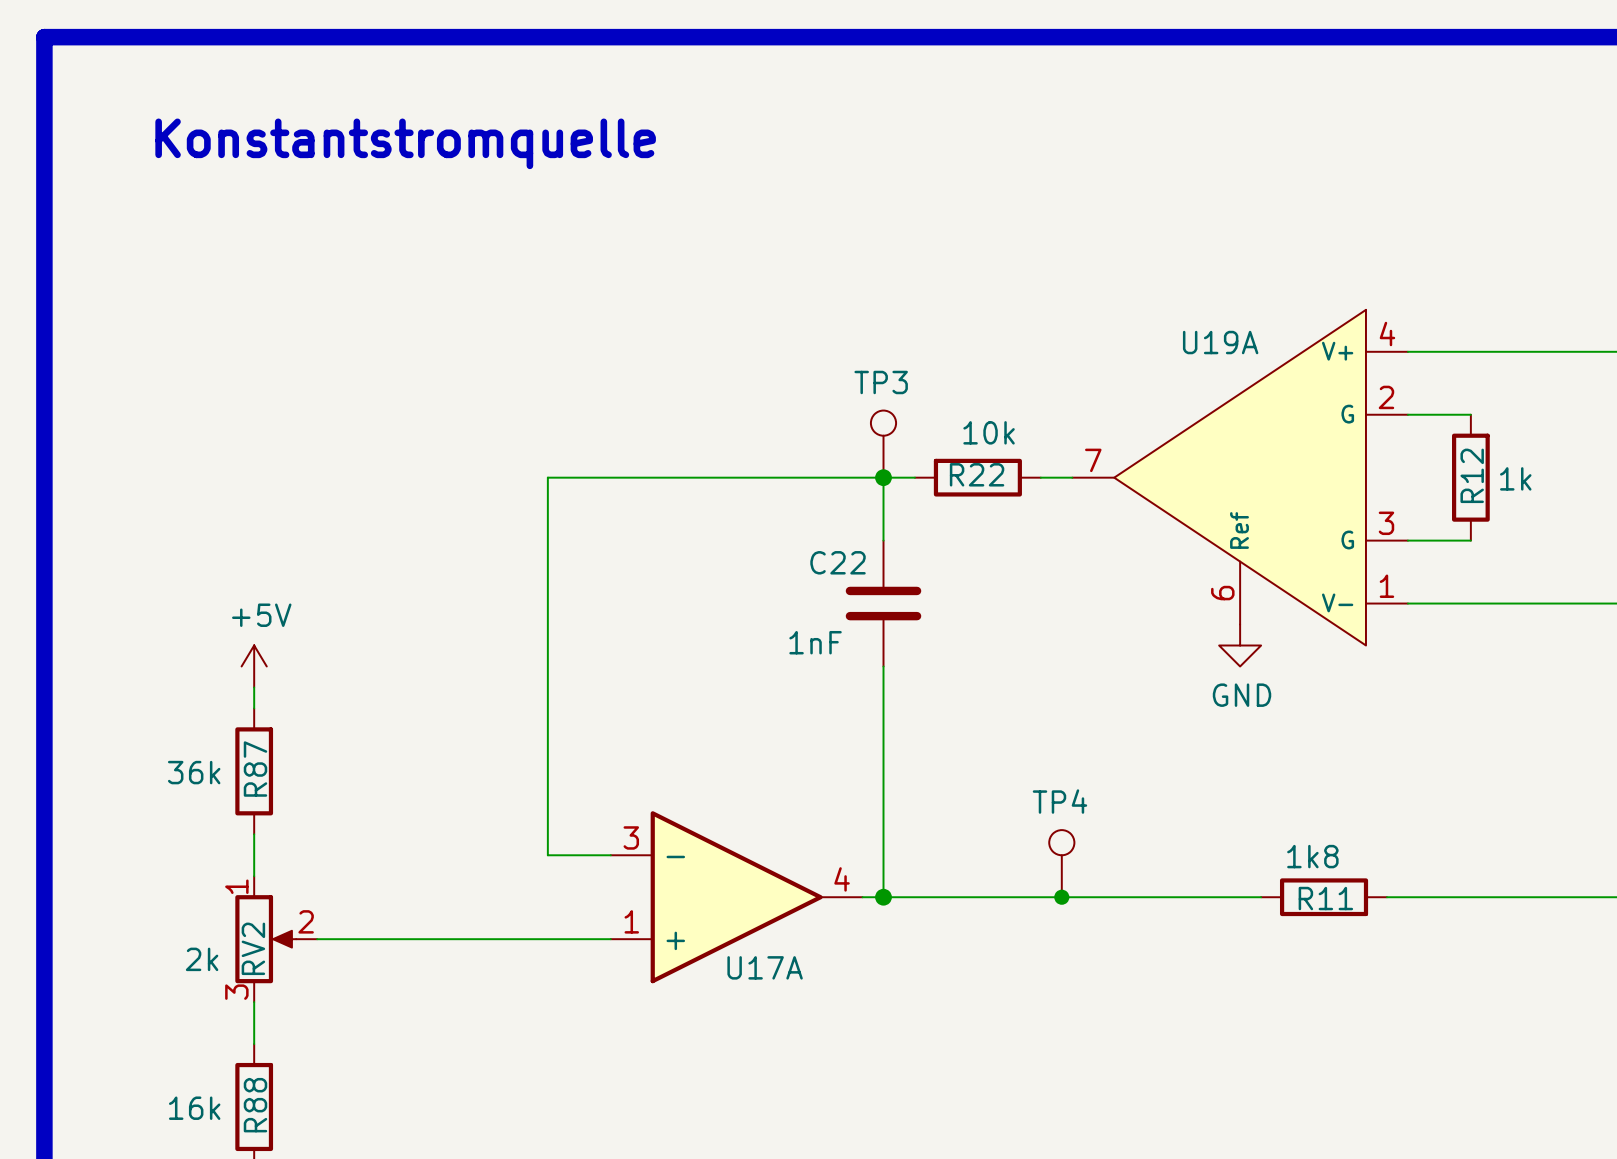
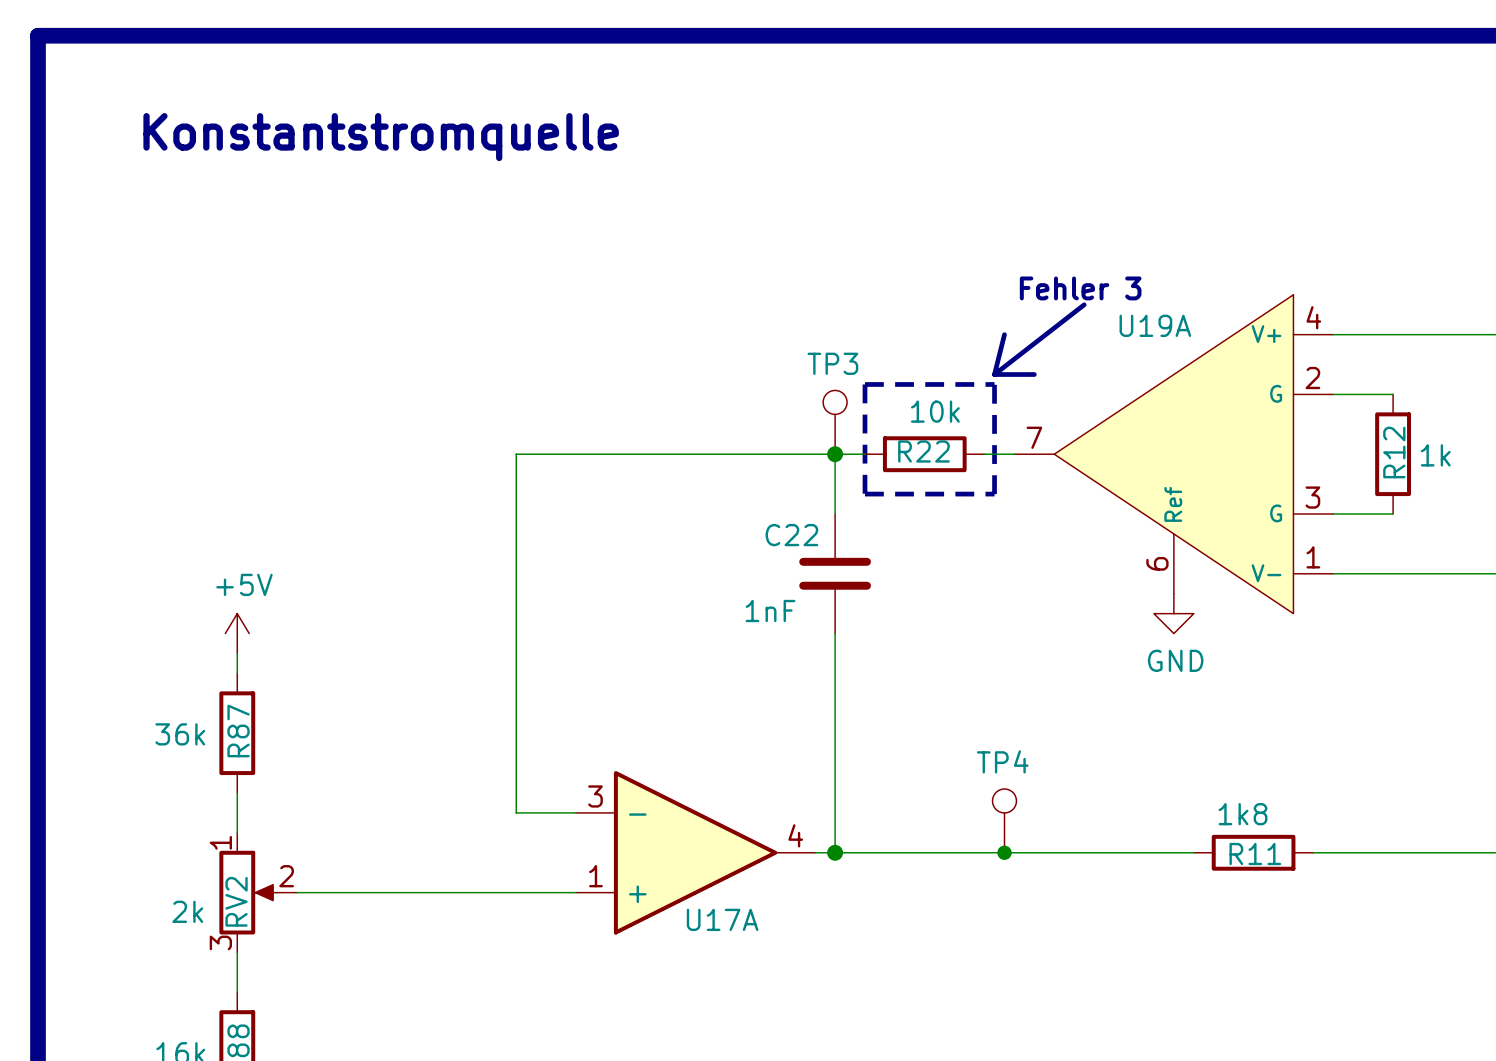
text: none -> Fehler 3 (1080, 288)
line: none -> (1084, 304) (994, 374)
line: none -> (1004, 334) (994, 374)
line: none -> (994, 374) (1034, 374)
line: none -> (865, 384) (865, 494) (994, 494) (994, 384) (865, 384)

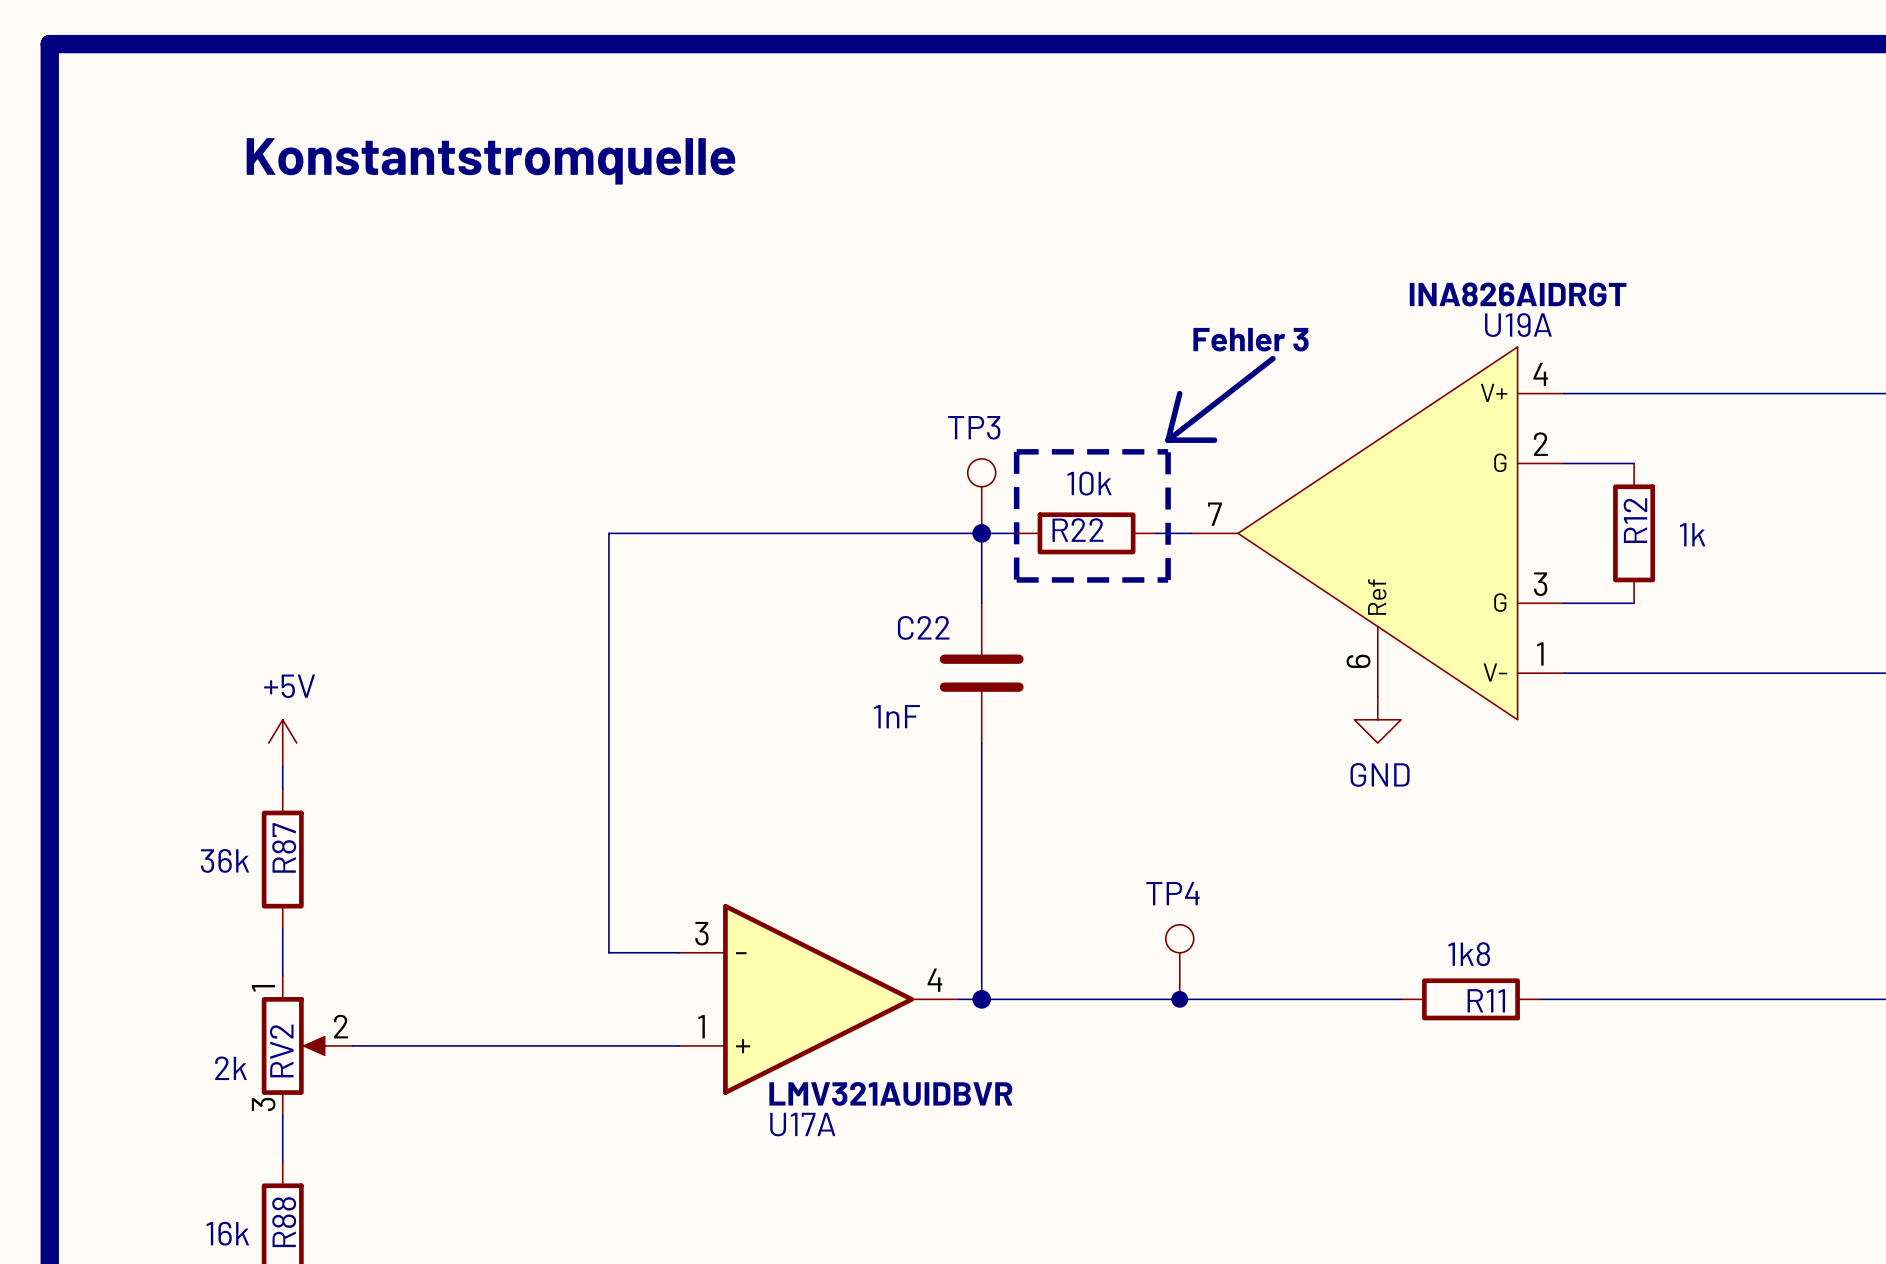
U19A value: none -> INA826AIDRGT (1518, 294)
U19A name position: U19A (1155, 325) -> U19A (1518, 325)
U17A name position: U17A (722, 919) -> U17A (802, 1124)
U17A value: none -> LMV321AUIDBVR (890, 1093)

